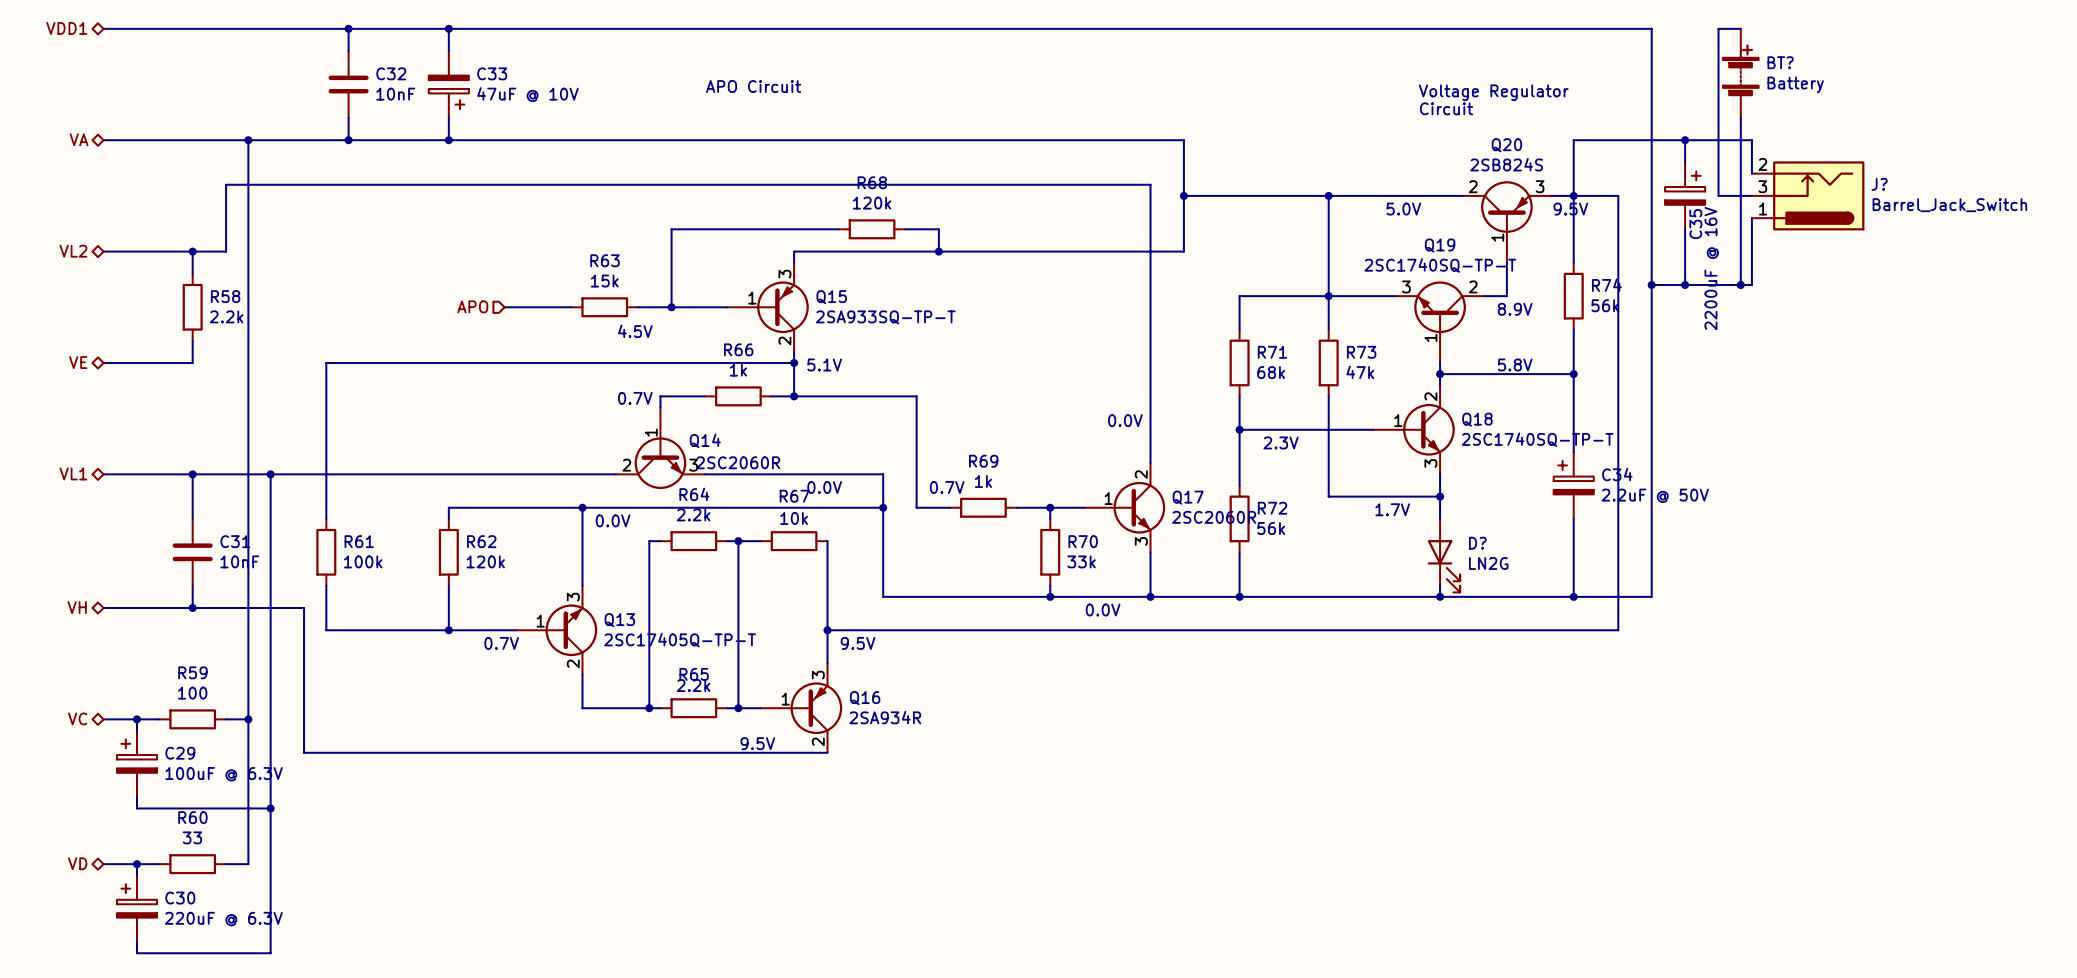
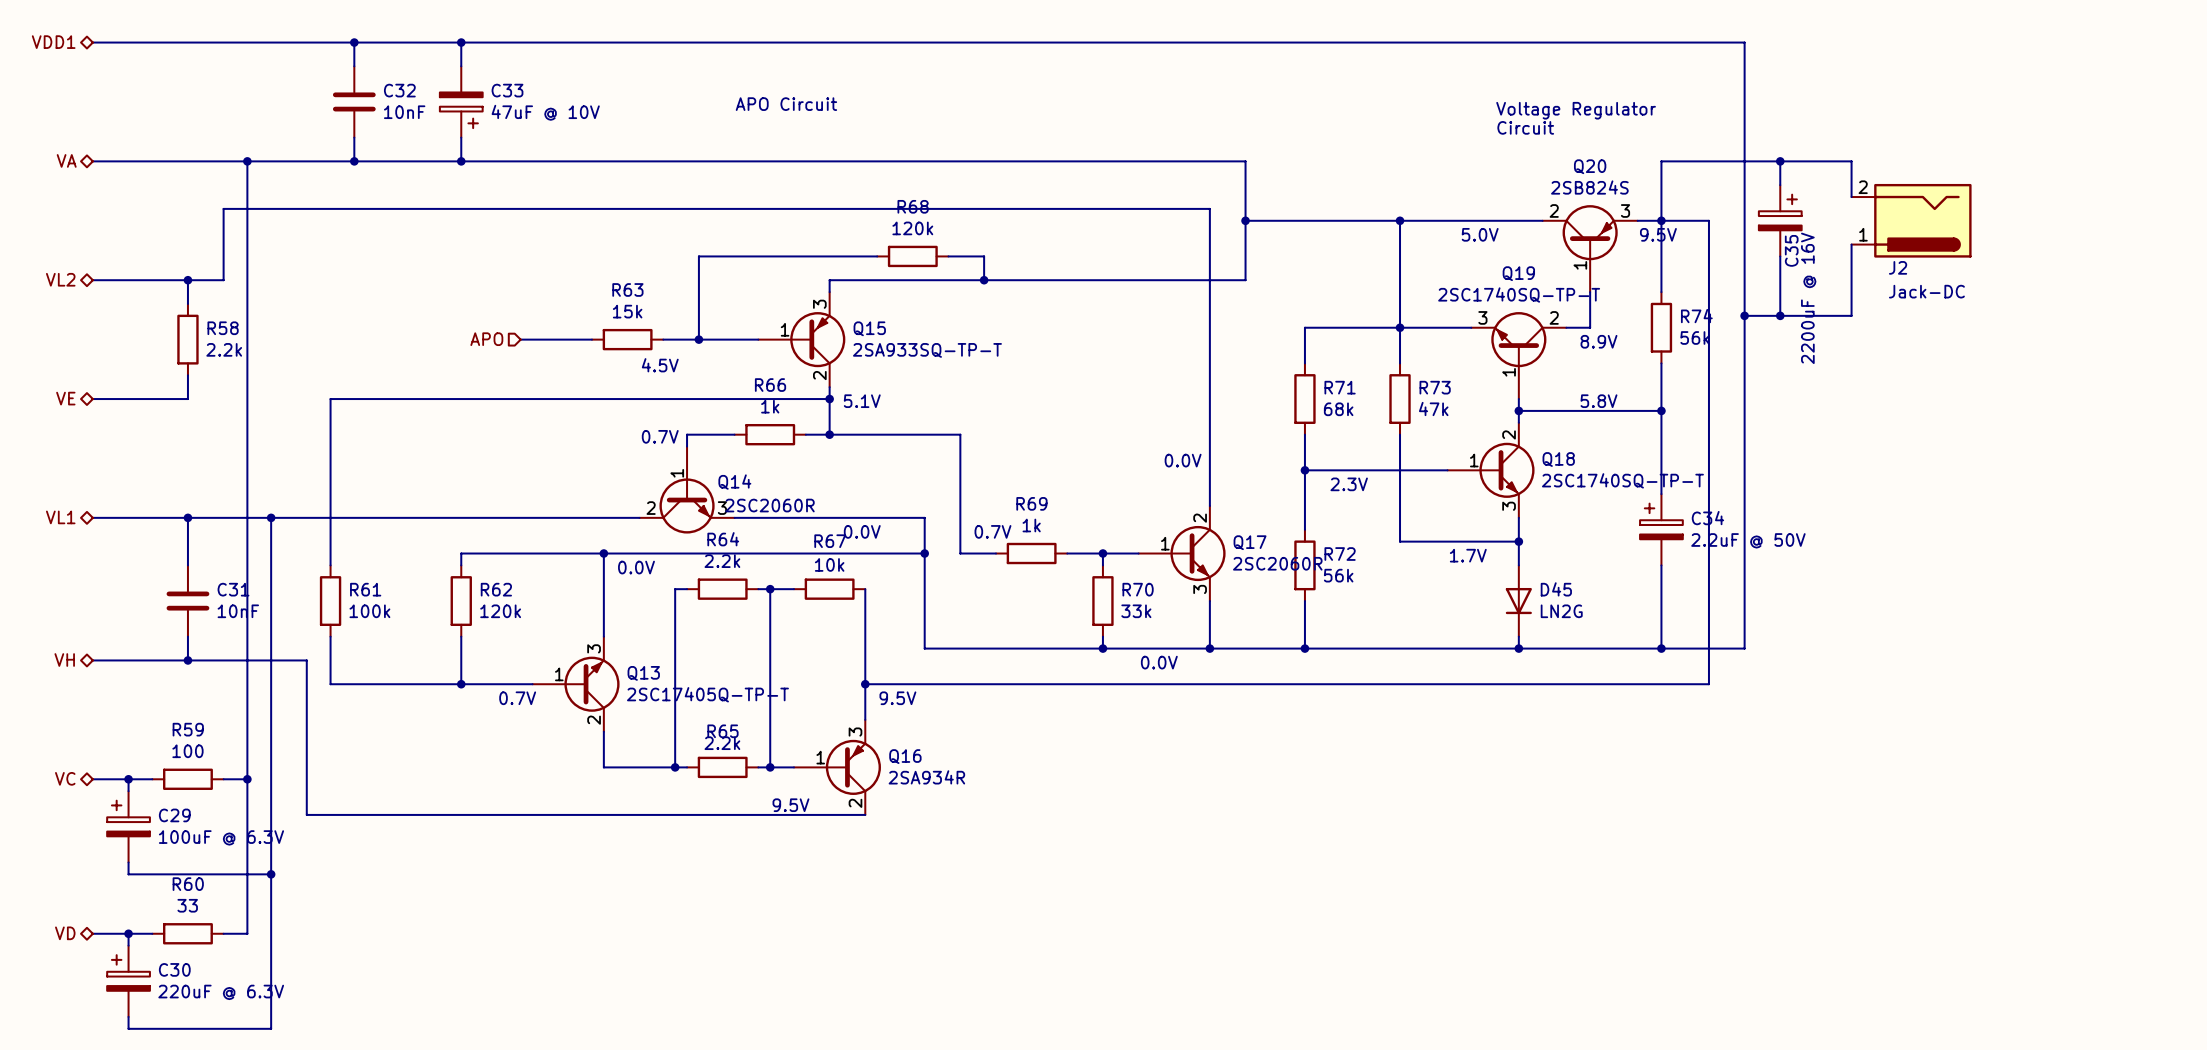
wire: (1740, 28) (1718, 28) (1718, 195) (1751, 195) -> none
BT?: Battery (1740, 73) -> none
wire: (1740, 117) (1740, 285) -> none
J?: Barrel_Jack_Switch (1808, 195) -> none
J2: none -> Jack-DC (1911, 220)
junction: (1740, 285) -> none
D45: none -> LN2G (1518, 601)
D?: LN2G (1443, 555) -> none

